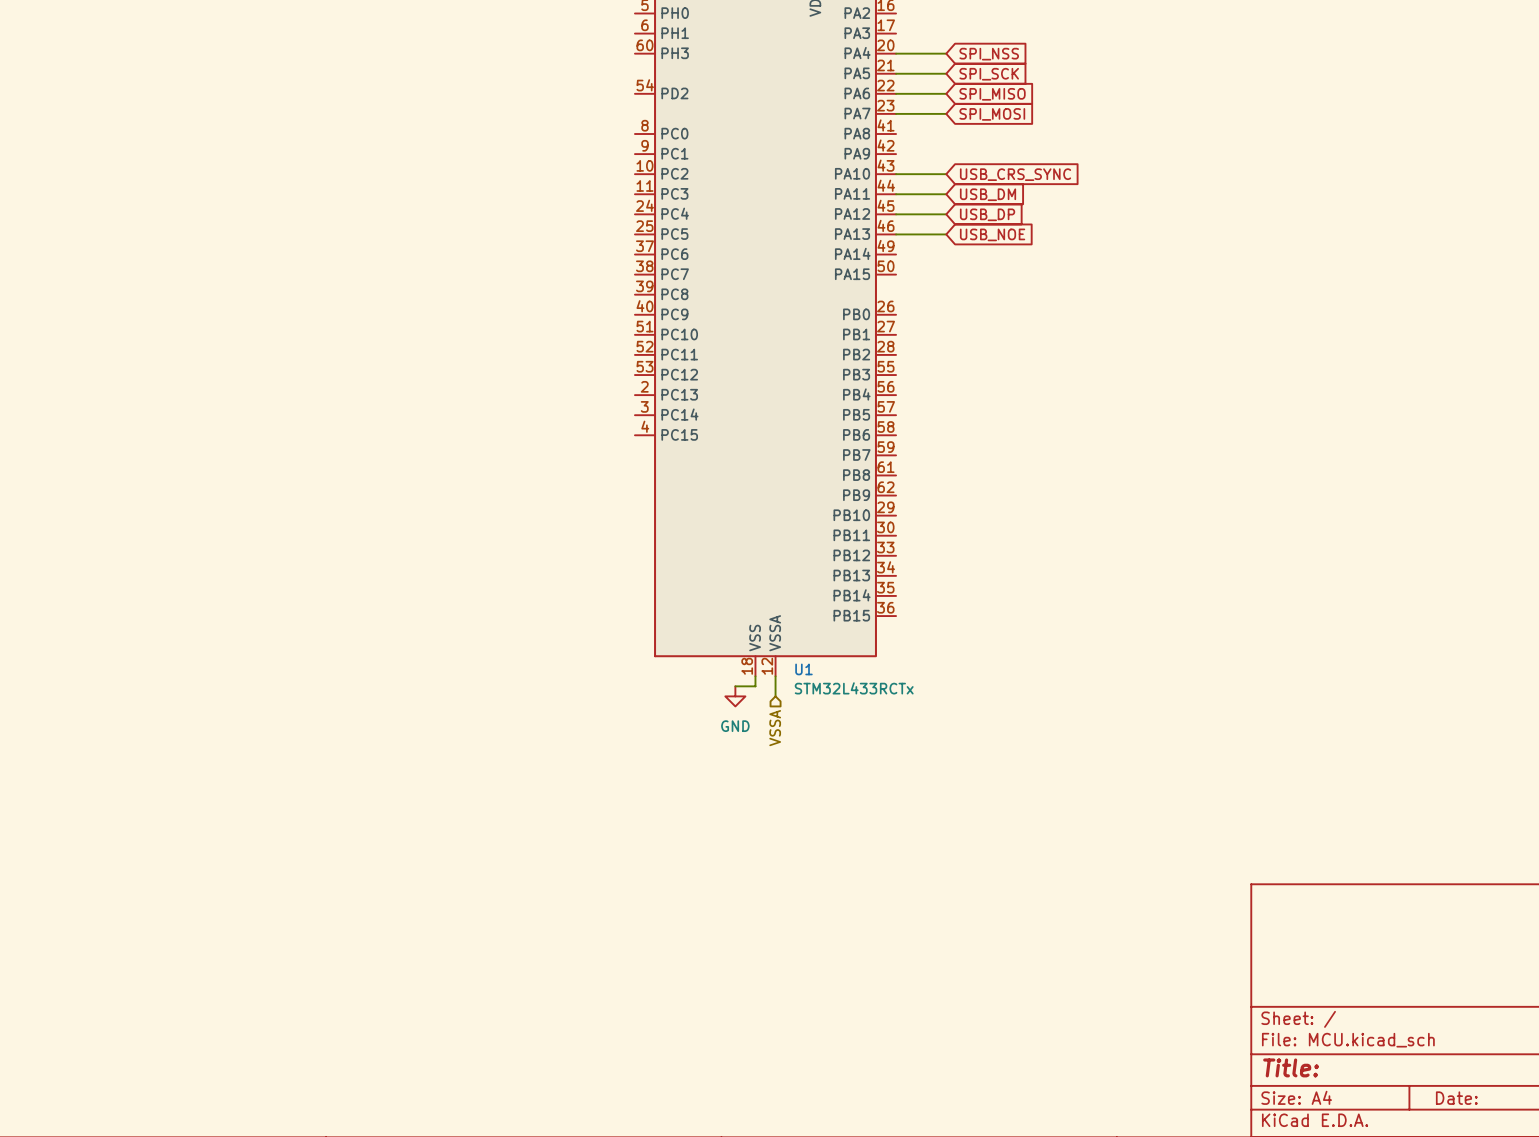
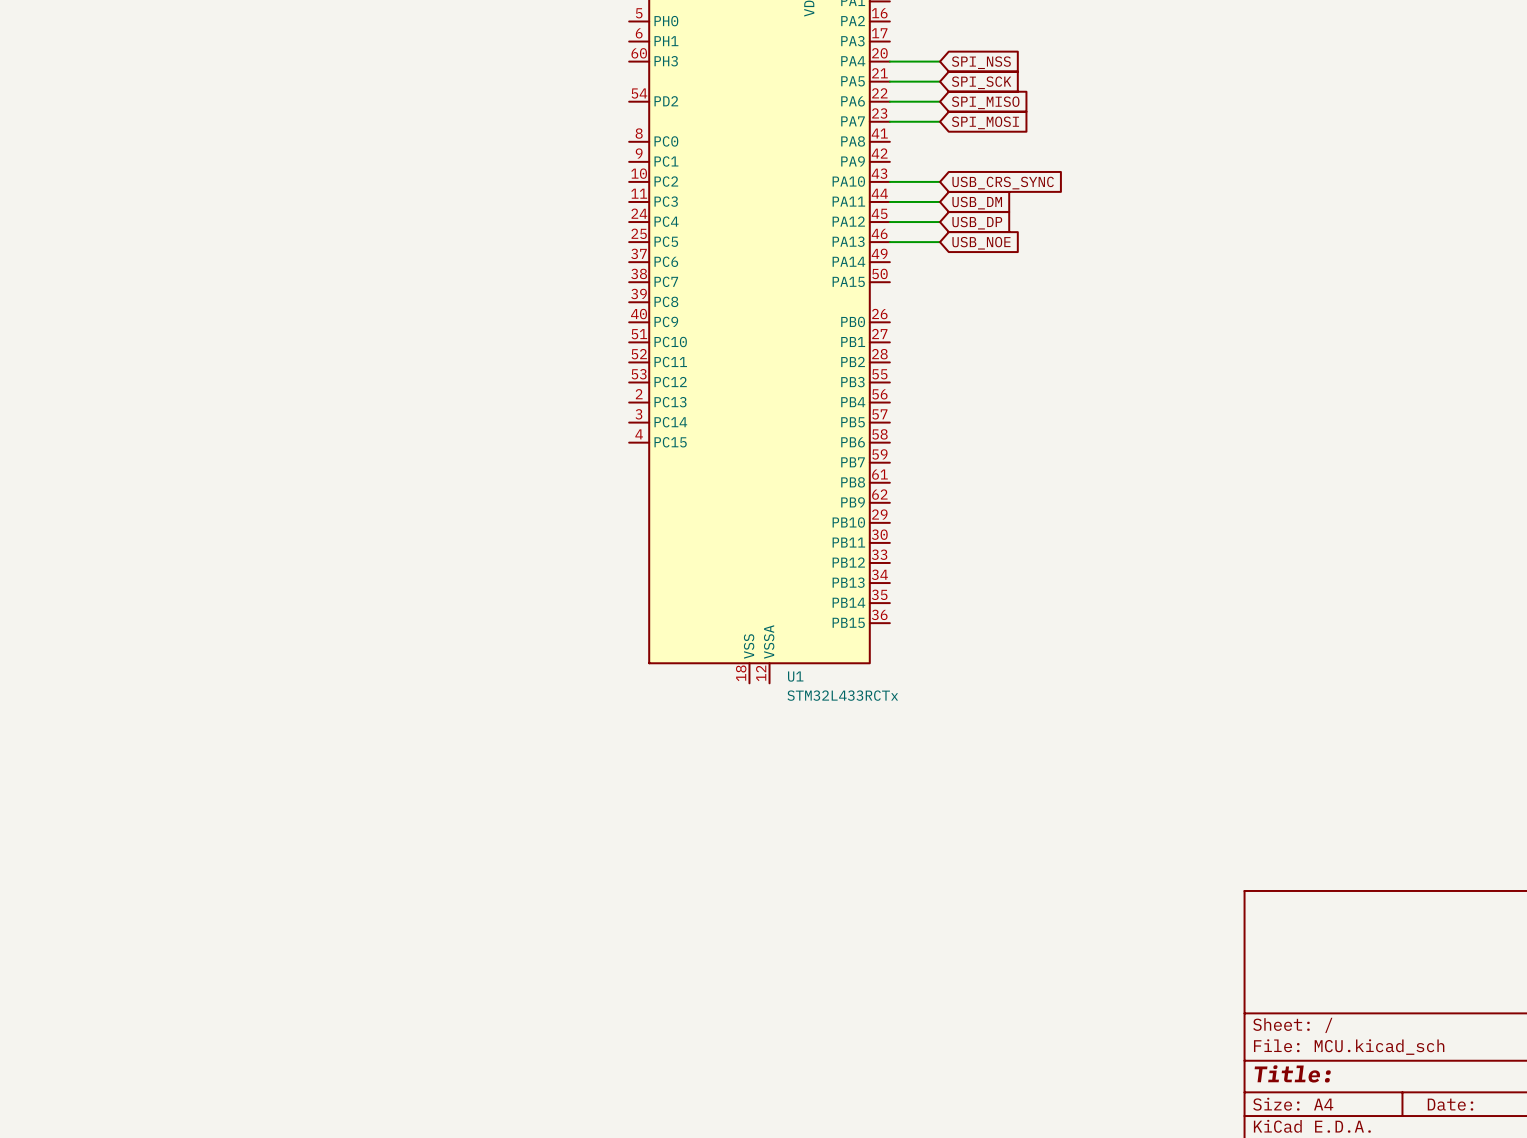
wire: (755, 676) (755, 686) (735, 686) -> none
wire: (775, 676) (775, 696) -> none
power symbol: GND (735, 696) -> none
hierarchical label: VSSA (775, 728) -> none

